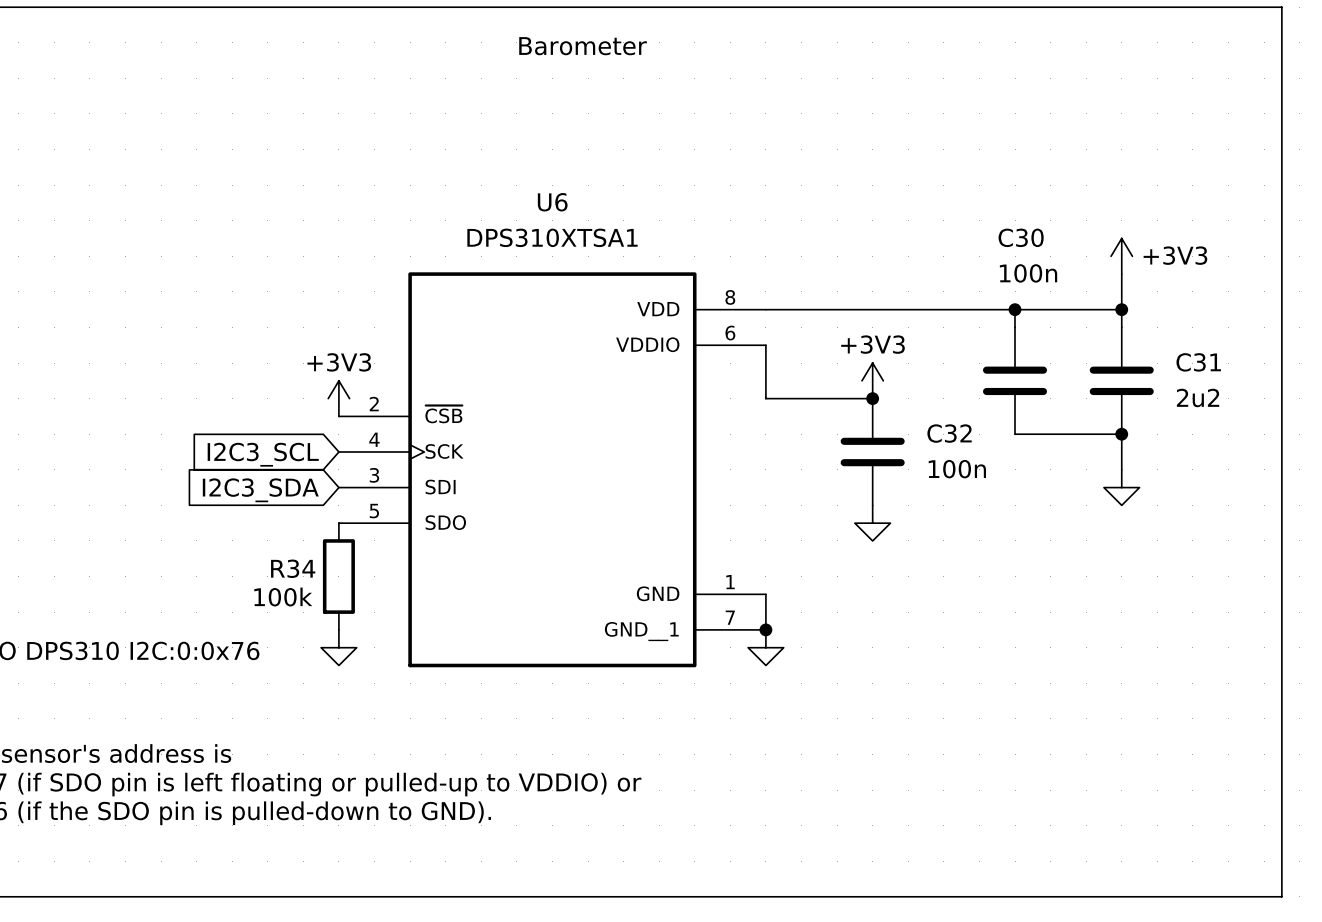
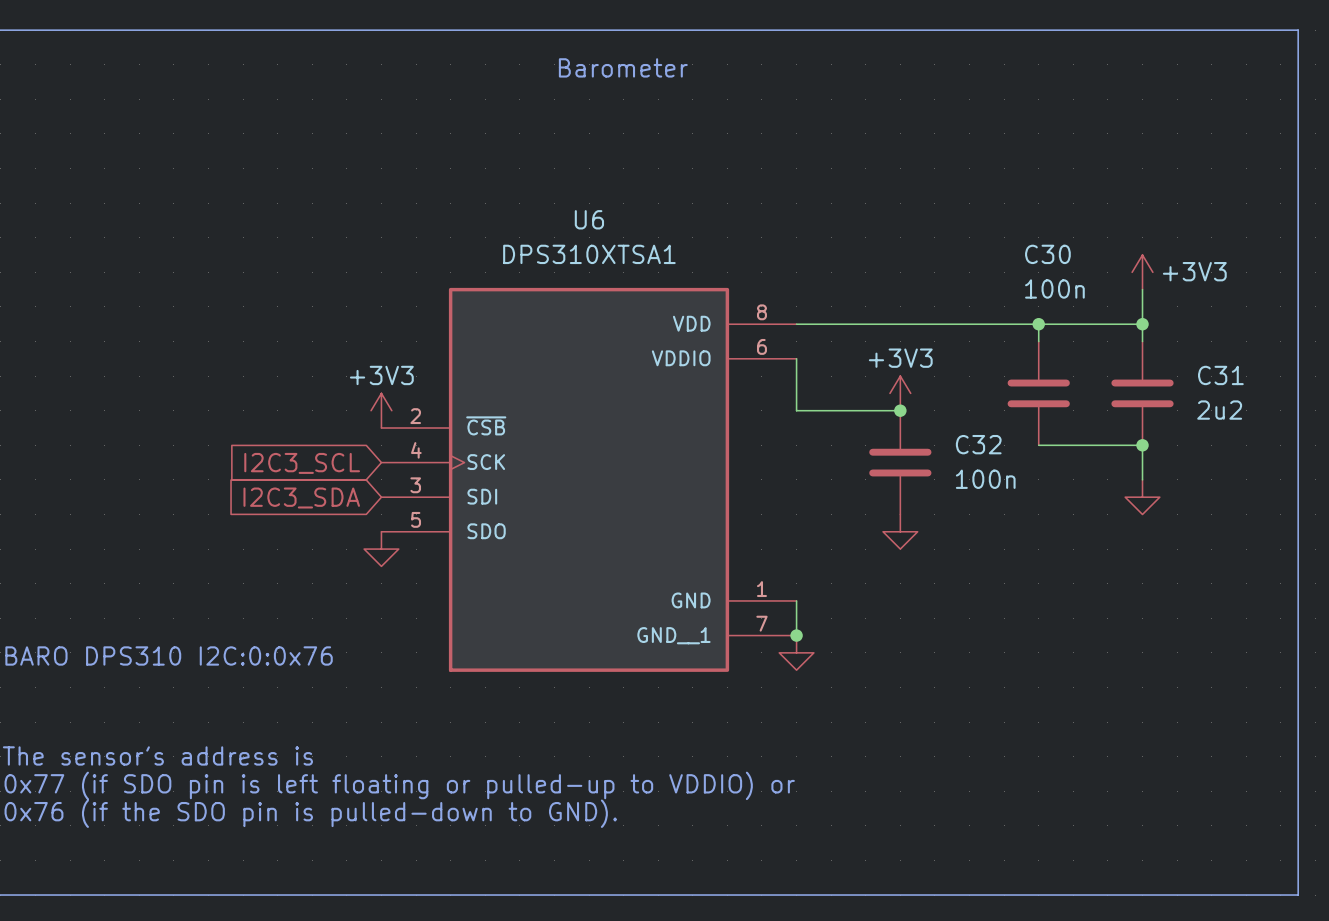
R34: 100k (338, 576) -> none
power symbol position: (338, 647) -> (381, 549)

